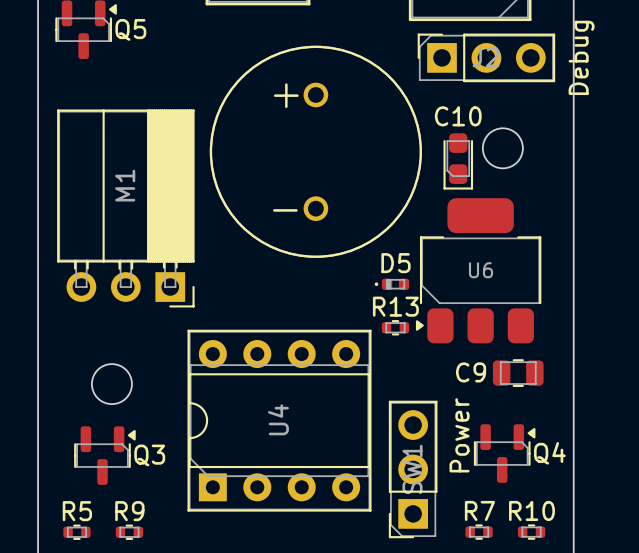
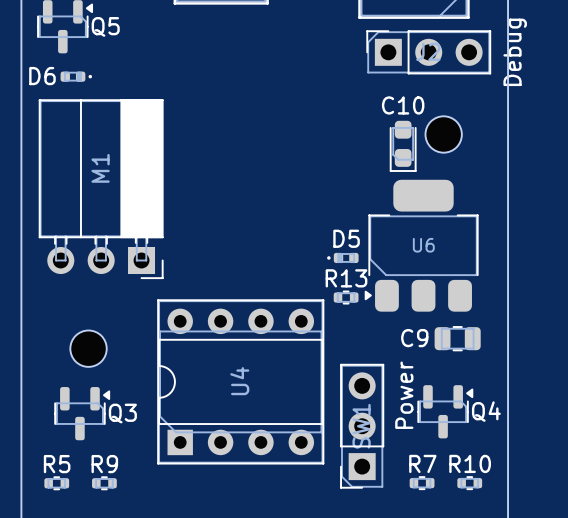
D6: none -> (76, 76)
part: (315, 151) -> none

